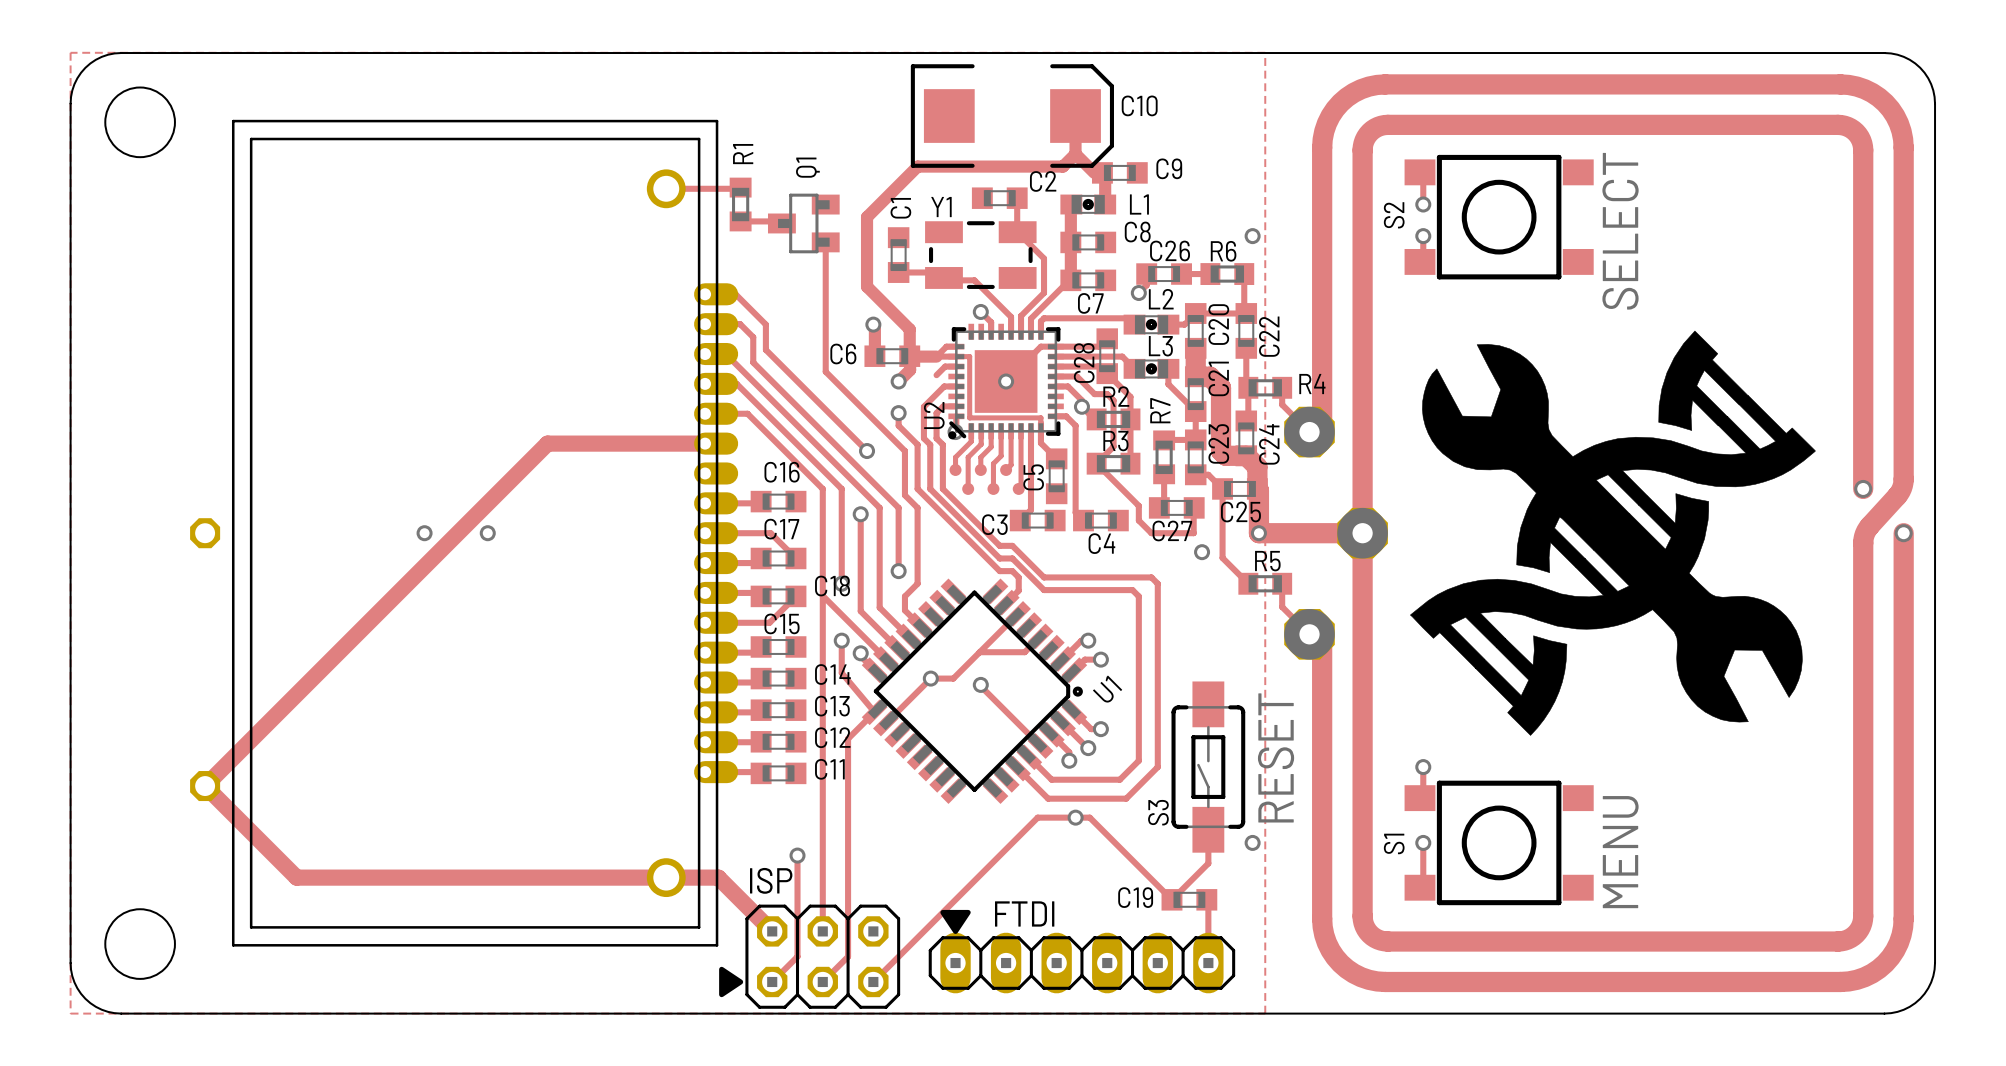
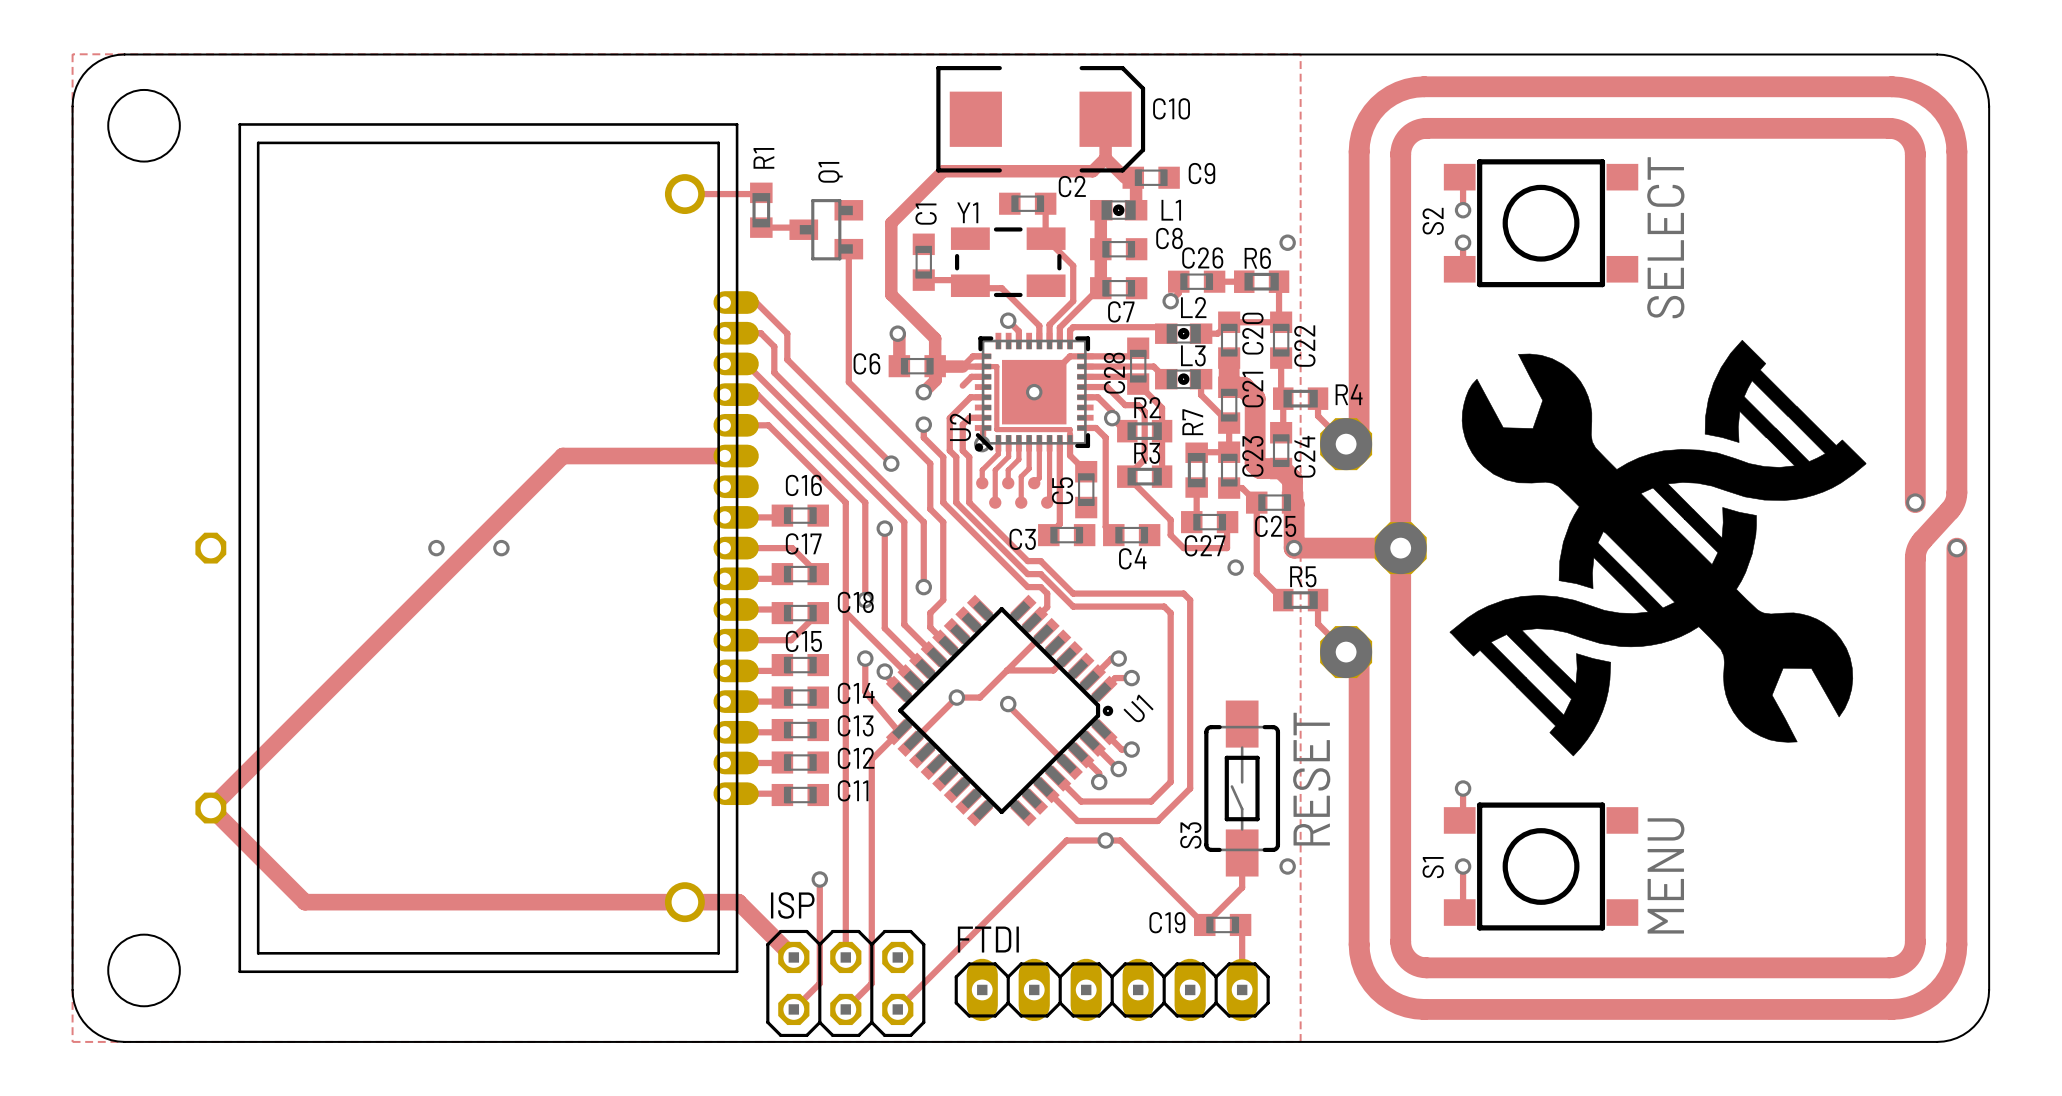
drawing: [940, 909, 971, 934] -> none
FTDI name position: FTDI (1024, 913) -> FTDI (988, 939)
drawing: [719, 966, 744, 998] -> none

